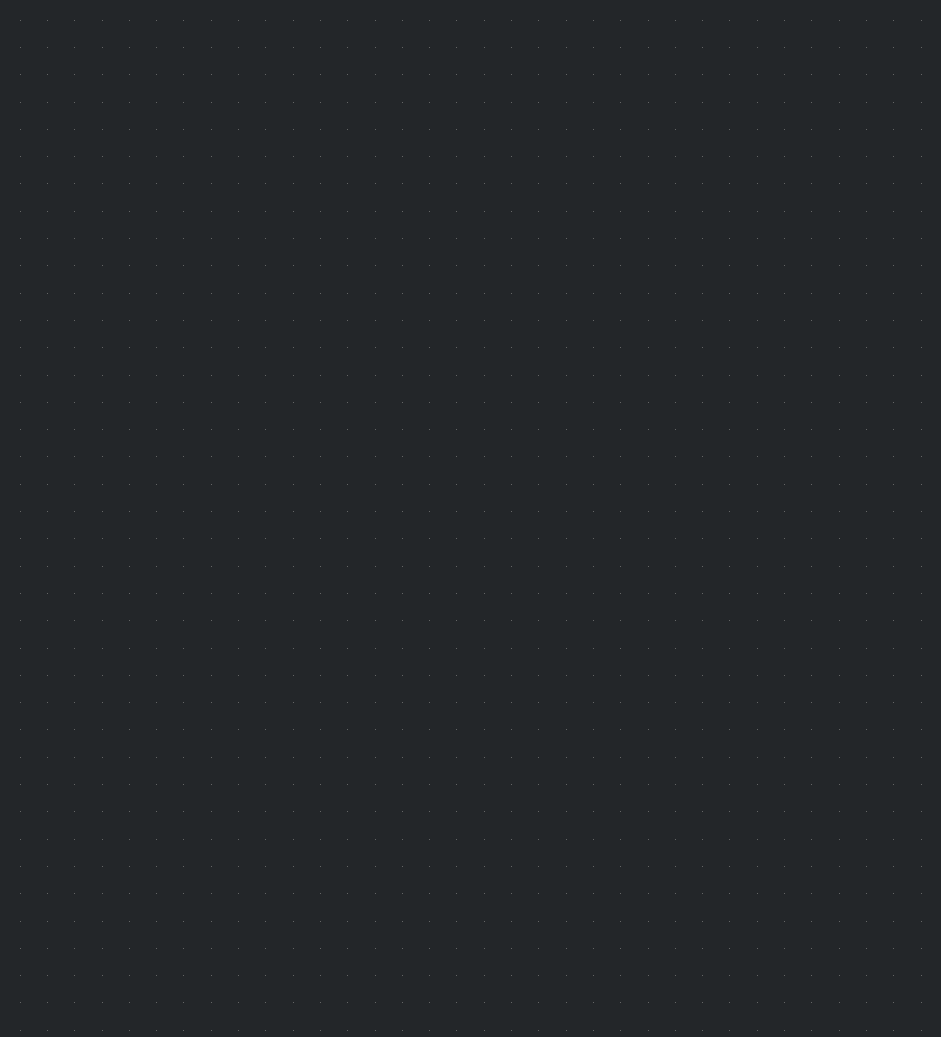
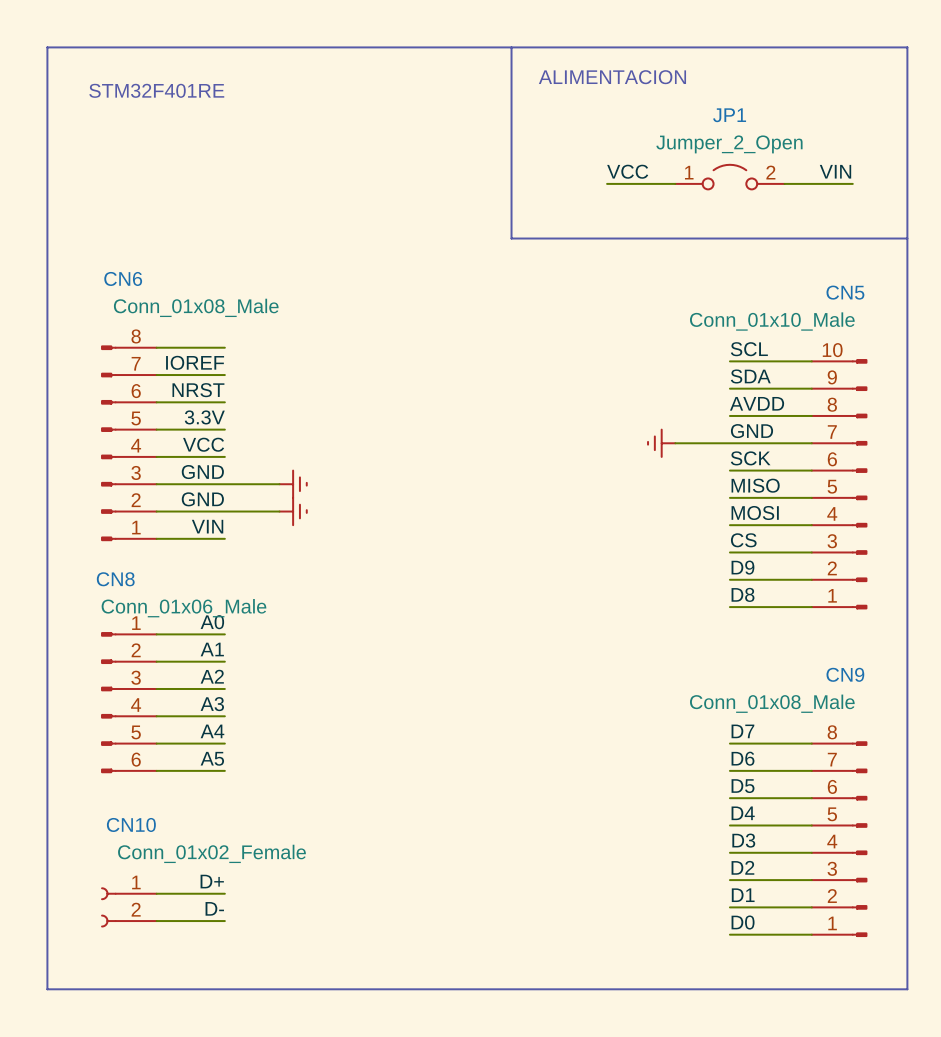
line: none -> (47, 47) (907, 47) (907, 989) (47, 989) (47, 47)
line: none -> (511, 47) (511, 238) (907, 238)
text: none -> ALIMENTACION (612, 77)
text: none -> STM32F401RE (156, 90)
label: none -> VCC (627, 171)
label: none -> VIN (835, 171)
JP1: none -> Jumper_2_Open (729, 177)
wire: none -> (607, 183) (675, 183)
wire: none -> (784, 183) (852, 183)
wire: none -> (156, 347) (224, 347)
label: none -> SCL (749, 349)
wire: none -> (729, 361) (811, 361)
label: none -> IOREF (195, 362)
wire: none -> (156, 375) (224, 375)
label: none -> SDA (750, 376)
wire: none -> (729, 388) (811, 388)
label: none -> NRST (198, 390)
wire: none -> (156, 402) (224, 402)
label: none -> AVDD (757, 403)
wire: none -> (729, 415) (811, 415)
label: none -> 3.3V (204, 417)
wire: none -> (156, 429) (224, 429)
label: none -> GND (752, 431)
CN6: none -> Conn_01x08_Male (128, 443)
power symbol: none -> (661, 443)
wire: none -> (675, 443) (811, 443)
label: none -> VCC (203, 444)
wire: none -> (156, 456) (224, 456)
label: none -> SCK (750, 458)
wire: none -> (729, 470) (811, 470)
label: none -> GND (202, 472)
wire: none -> (156, 484) (279, 484)
power symbol: none -> (293, 484)
CN5: none -> Conn_01x10_Male (839, 484)
label: none -> MISO (755, 485)
wire: none -> (729, 497) (811, 497)
label: none -> GND (202, 499)
wire: none -> (156, 511) (279, 511)
power symbol: none -> (293, 511)
label: none -> MOSI (755, 512)
wire: none -> (729, 525) (811, 525)
label: none -> VIN (207, 526)
wire: none -> (156, 538) (224, 538)
label: none -> CS (743, 540)
wire: none -> (729, 552) (811, 552)
label: none -> D9 (742, 567)
wire: none -> (729, 579) (811, 579)
label: none -> D8 (743, 594)
wire: none -> (729, 607) (811, 607)
label: none -> A0 (212, 622)
wire: none -> (156, 634) (224, 634)
label: none -> A1 (212, 649)
wire: none -> (156, 661) (224, 661)
label: none -> A2 (212, 676)
wire: none -> (156, 688) (224, 688)
CN8: none -> Conn_01x06_Male (128, 702)
label: none -> A3 (212, 704)
wire: none -> (156, 716) (224, 716)
label: none -> A4 (212, 731)
label: none -> D7 (742, 731)
wire: none -> (156, 743) (224, 743)
wire: none -> (729, 743) (811, 743)
label: none -> A5 (212, 758)
label: none -> D6 (742, 758)
wire: none -> (156, 770) (224, 770)
wire: none -> (729, 770) (811, 770)
label: none -> D5 (743, 786)
wire: none -> (729, 798) (811, 798)
label: none -> D4 (743, 813)
wire: none -> (729, 825) (811, 825)
CN9: none -> Conn_01x08_Male (839, 839)
label: none -> D3 (743, 840)
wire: none -> (729, 852) (811, 852)
label: none -> D2 (742, 867)
wire: none -> (729, 880) (811, 880)
label: none -> D+ (212, 881)
wire: none -> (156, 893) (224, 893)
label: none -> D1 (743, 895)
CN10: none -> Conn_01x02_Female (128, 907)
wire: none -> (729, 907) (811, 907)
label: none -> D- (214, 908)
wire: none -> (156, 921) (224, 921)
label: none -> D0 (743, 922)
wire: none -> (729, 934) (811, 934)

